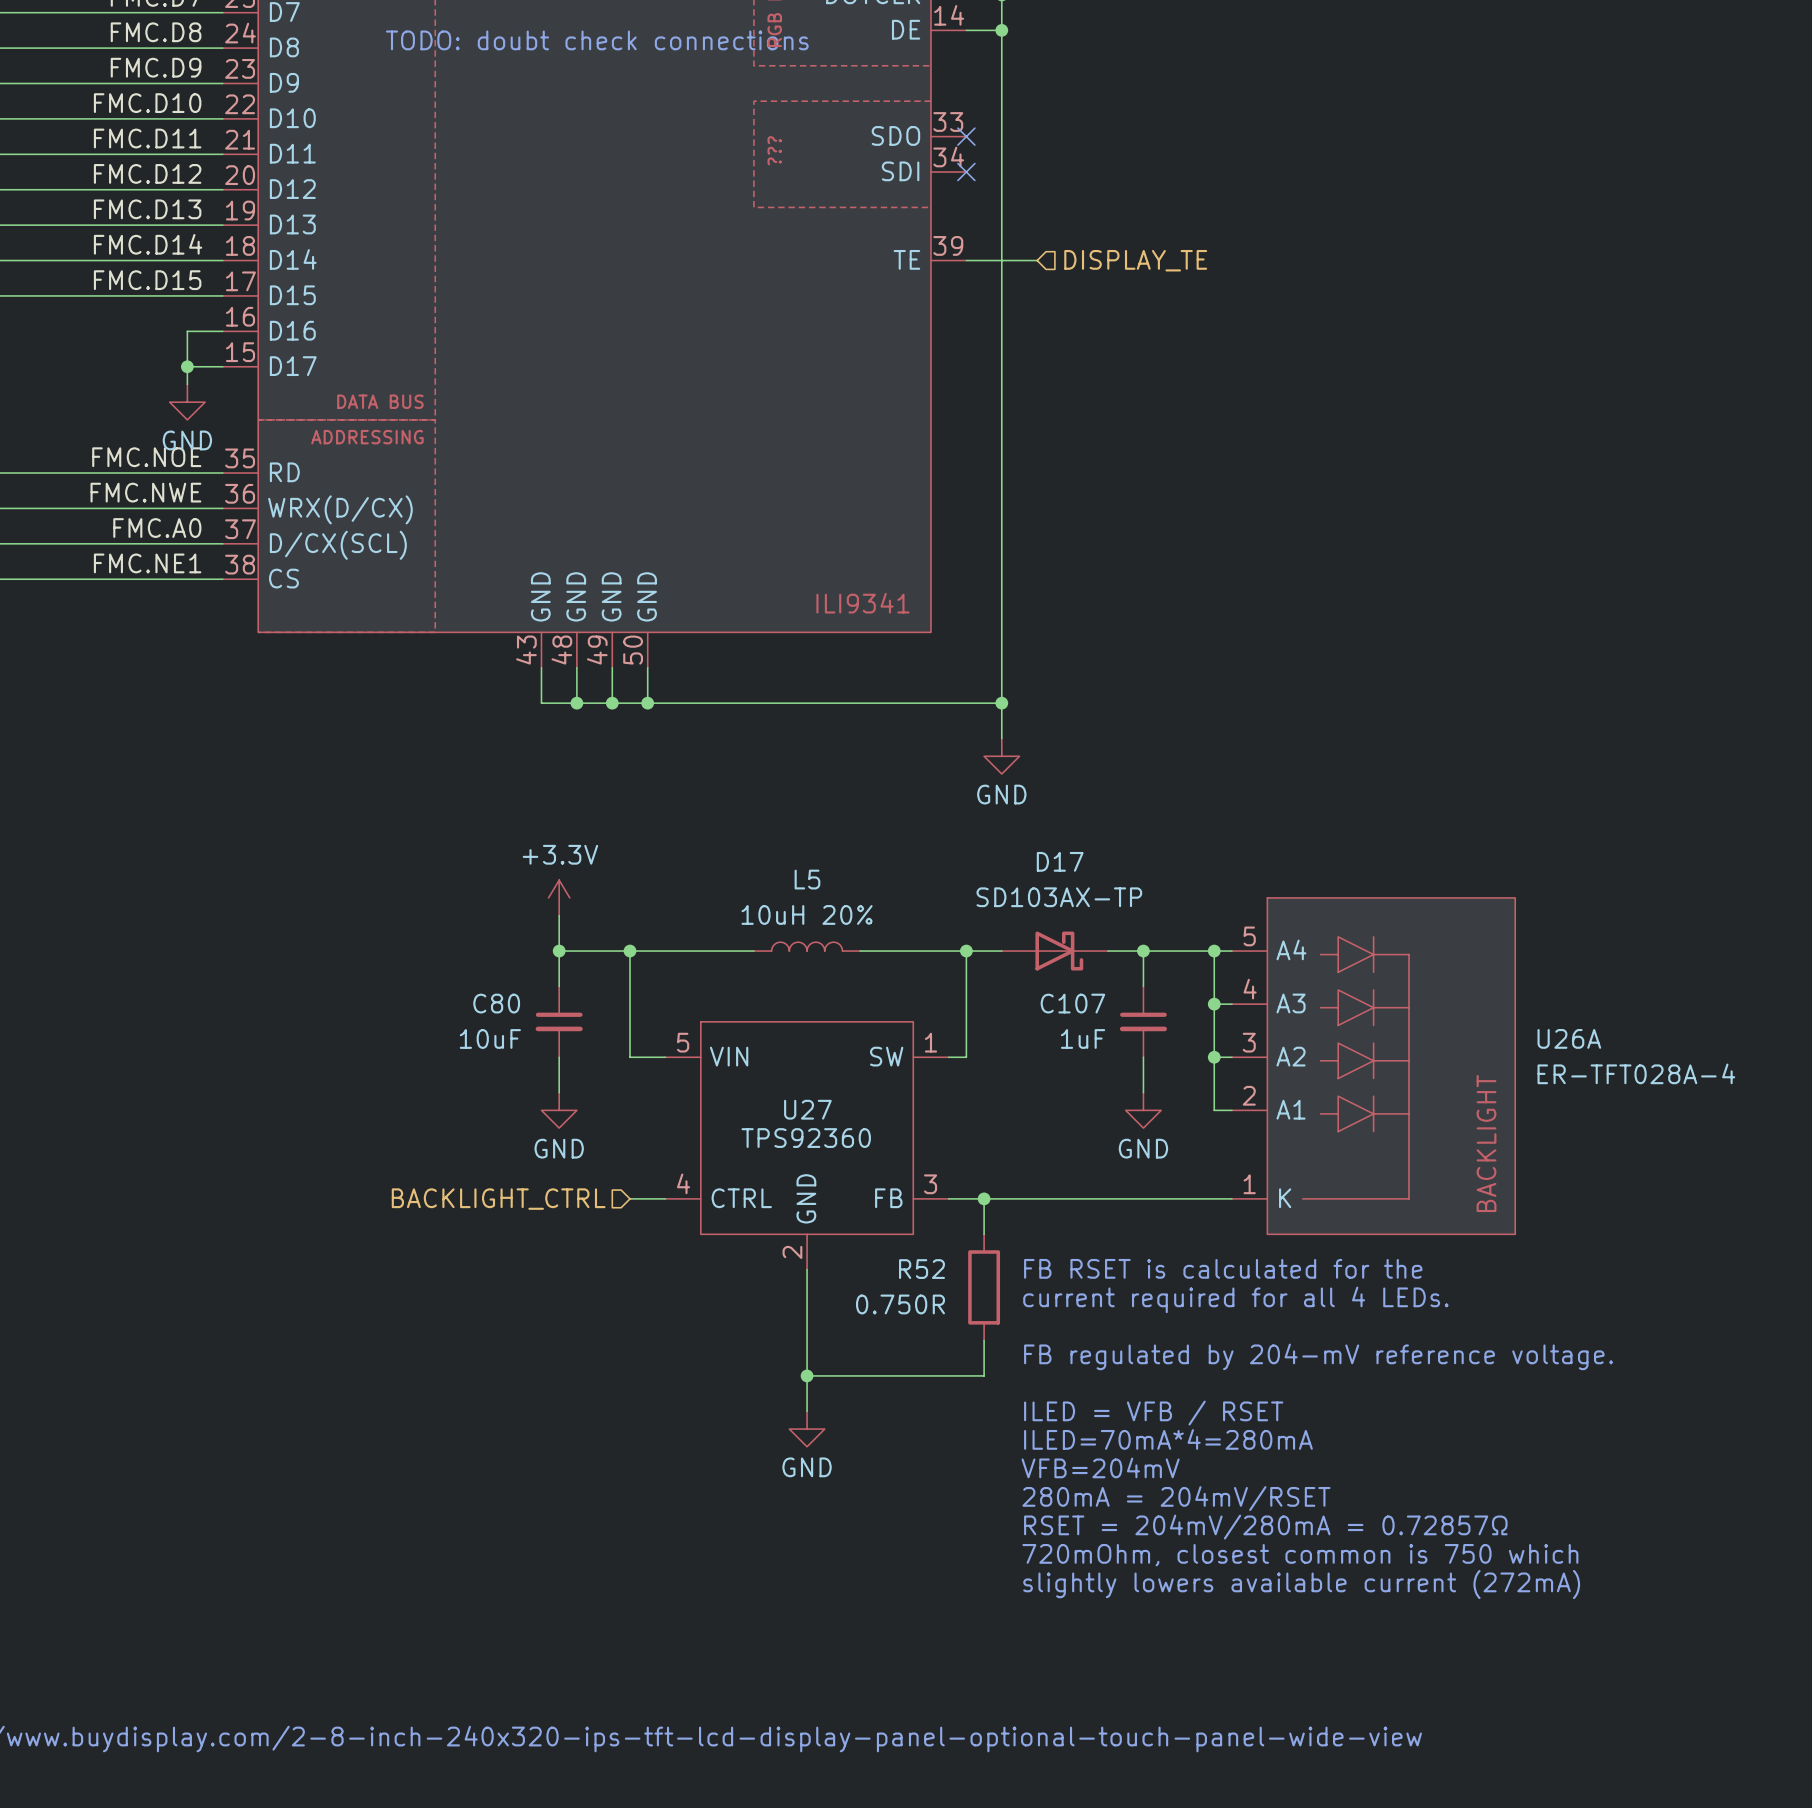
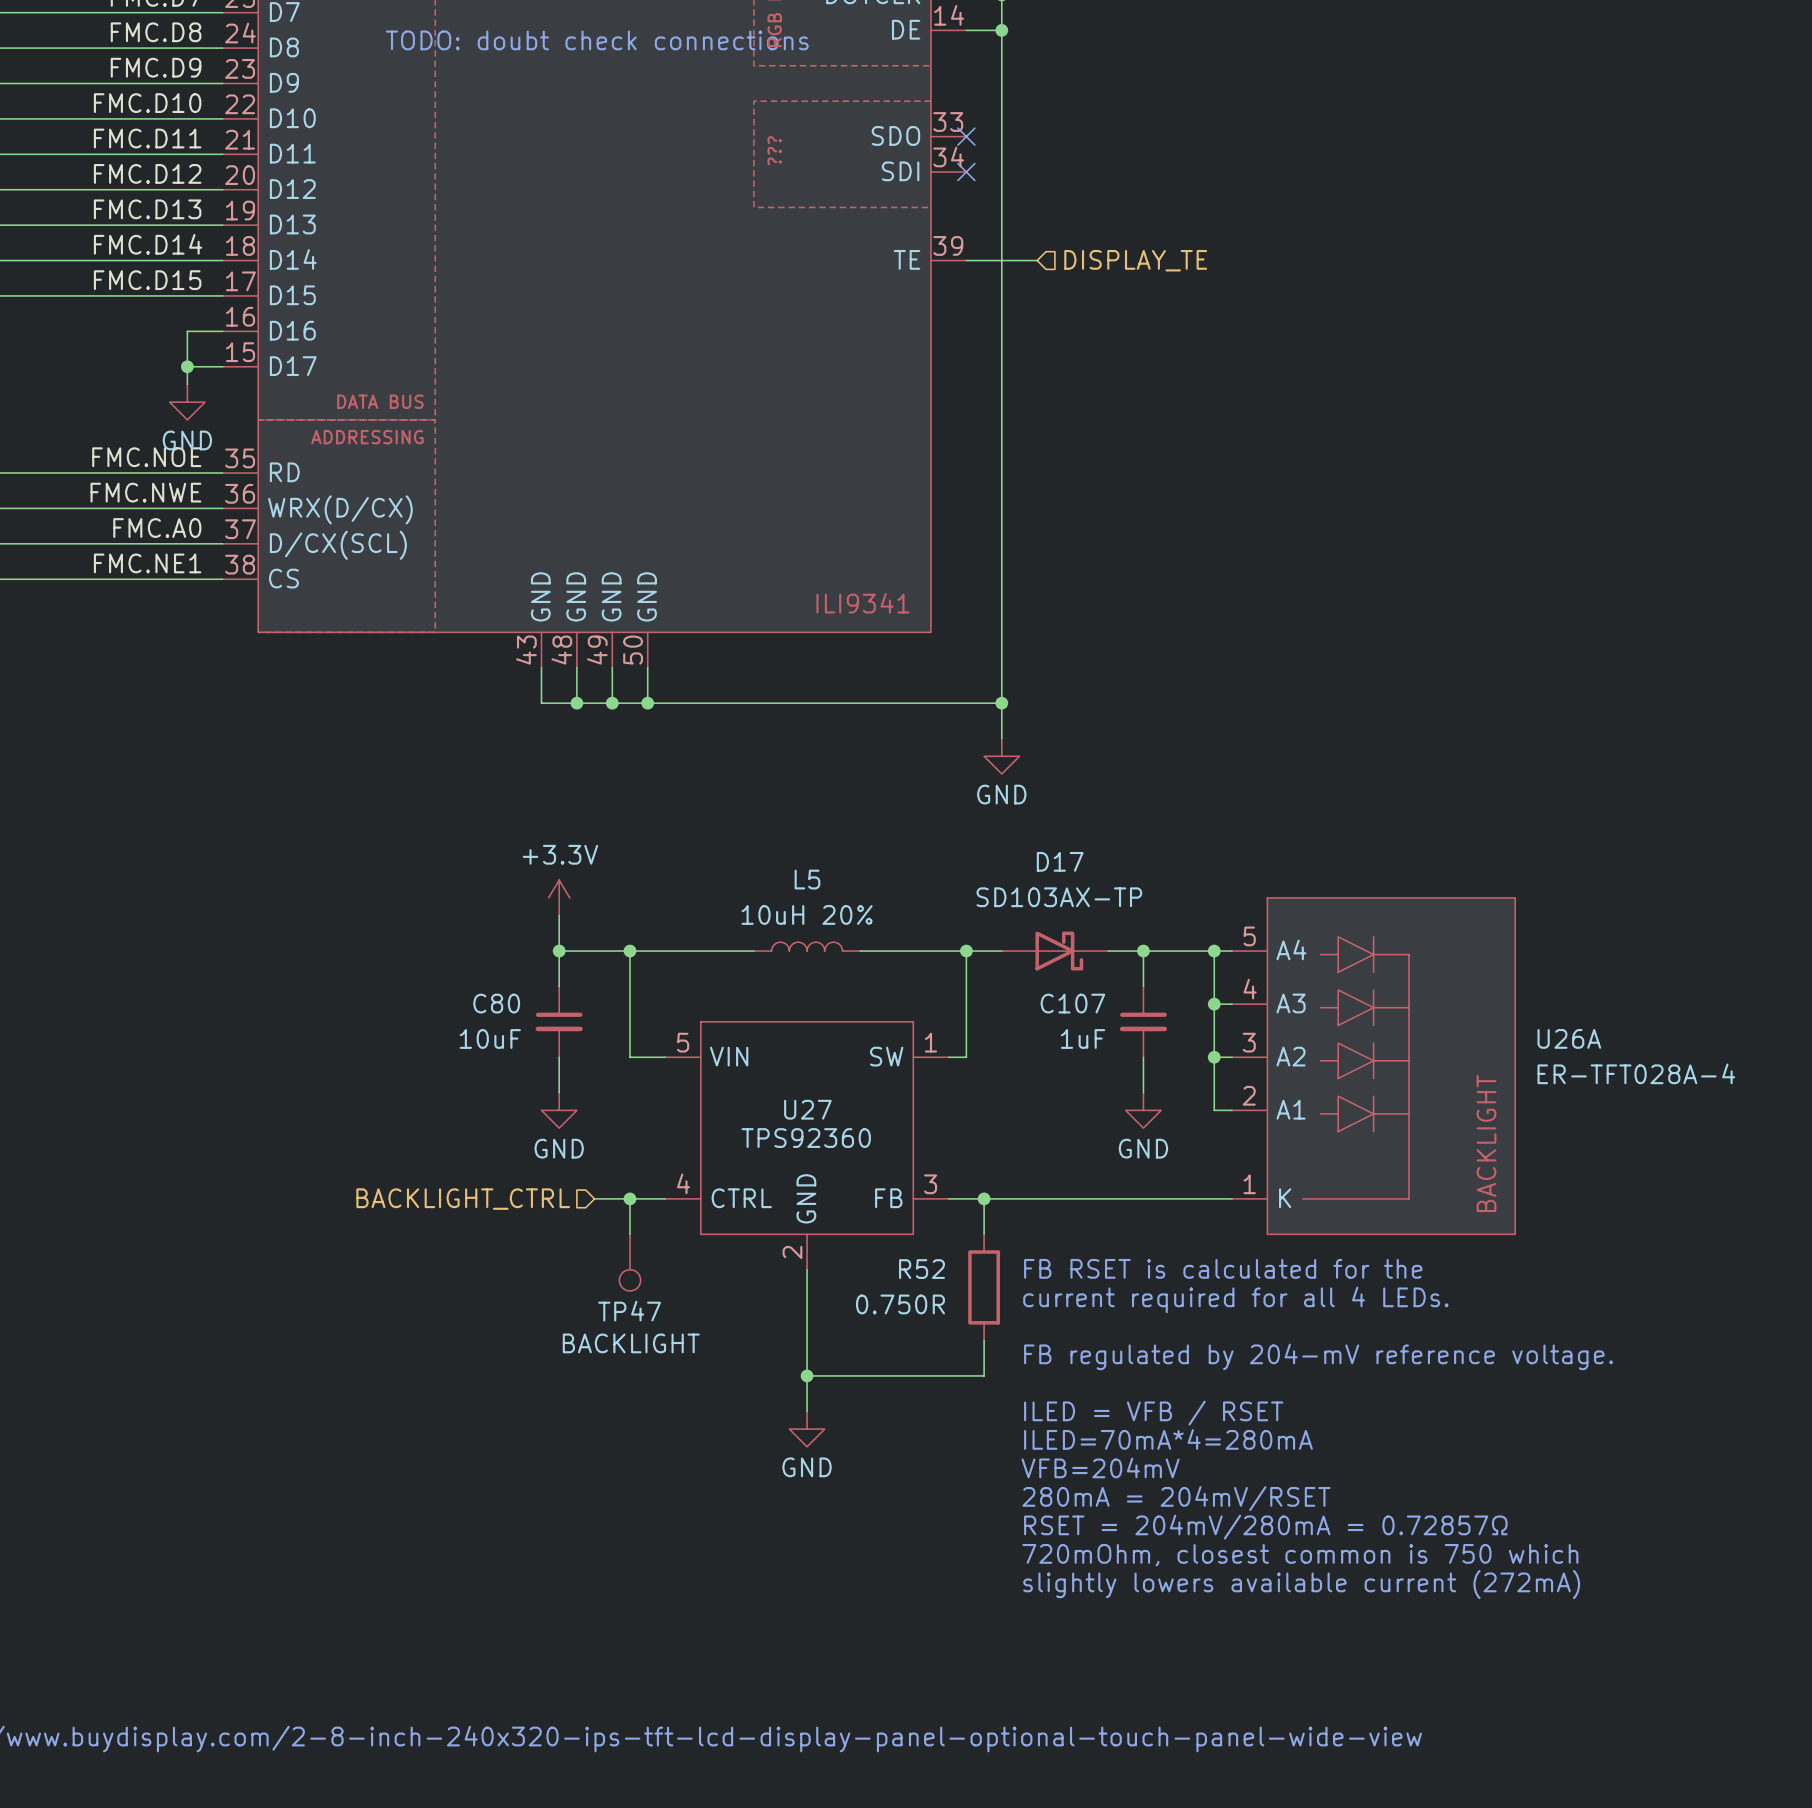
wire: none -> (594, 1198) (630, 1198) (630, 1234)
junction: none -> (630, 1198)
hierarchical label position: BACKLIGHT_CTRL (498, 1199) -> BACKLIGHT_CTRL (463, 1199)
TP47: none -> BACKLIGHT (630, 1262)

